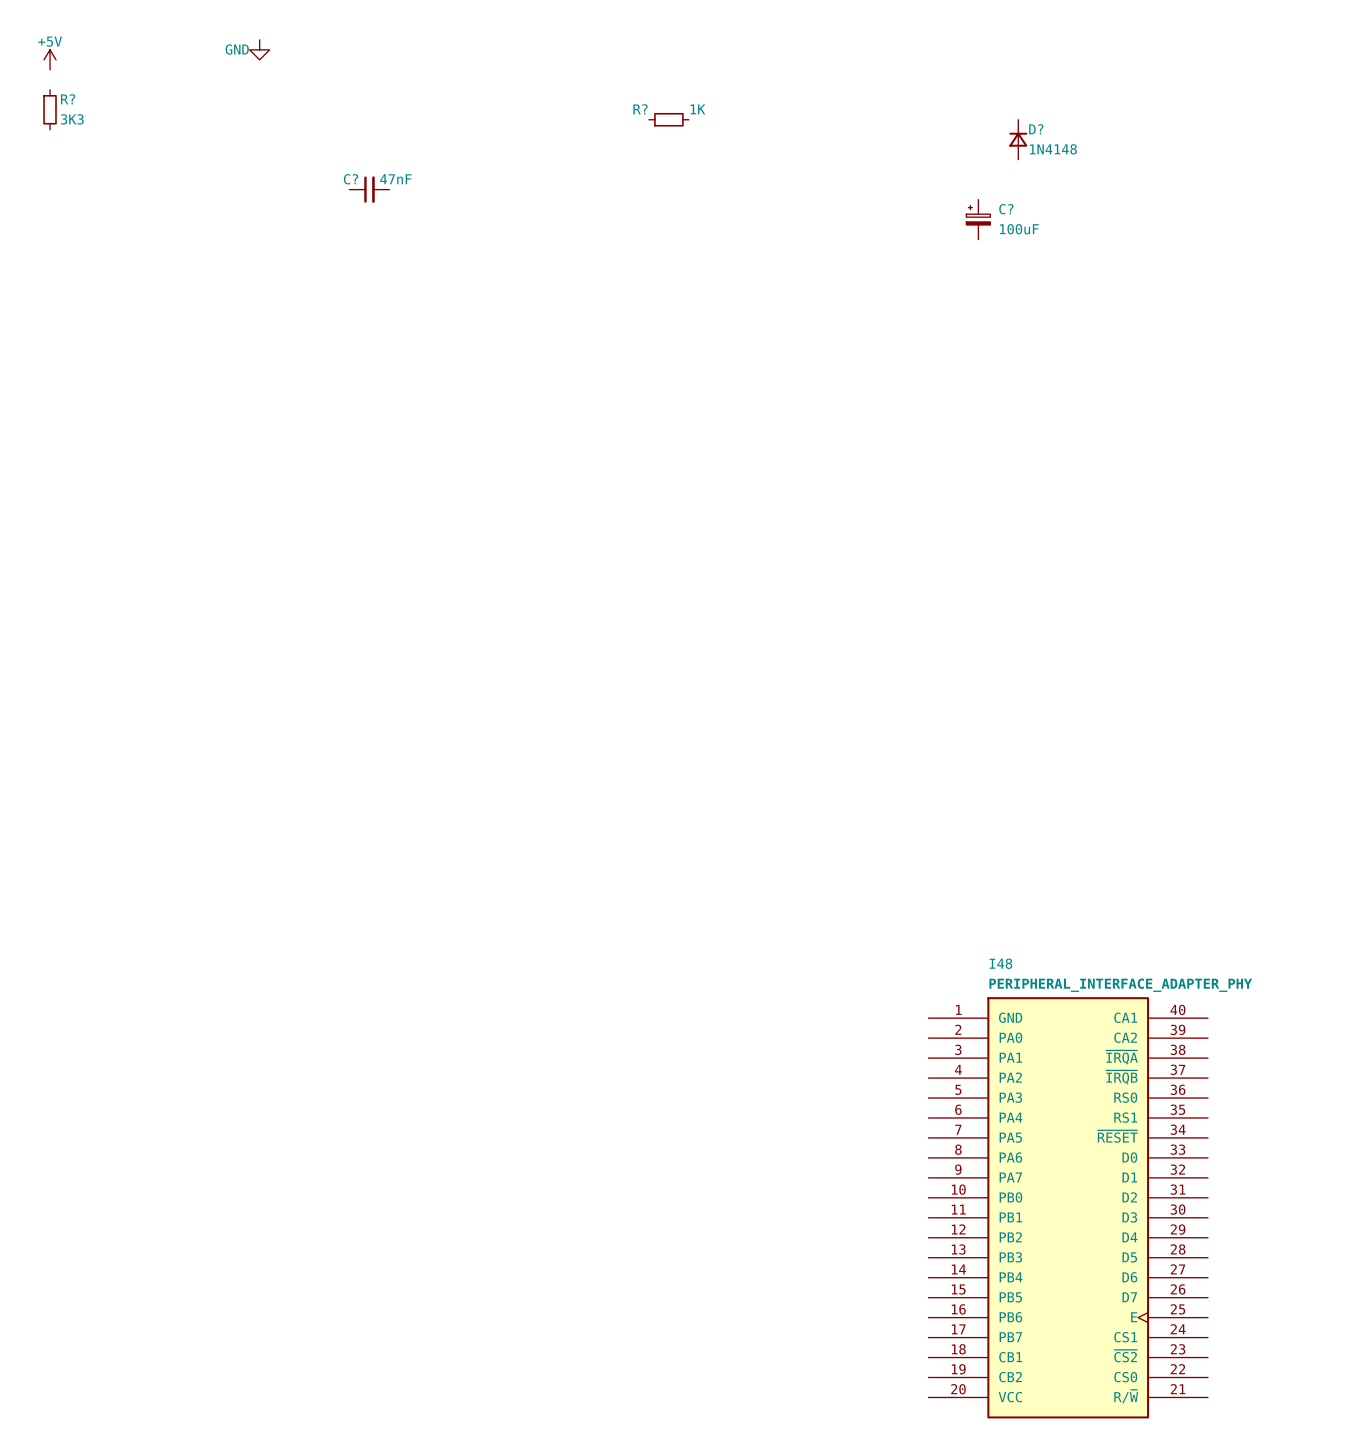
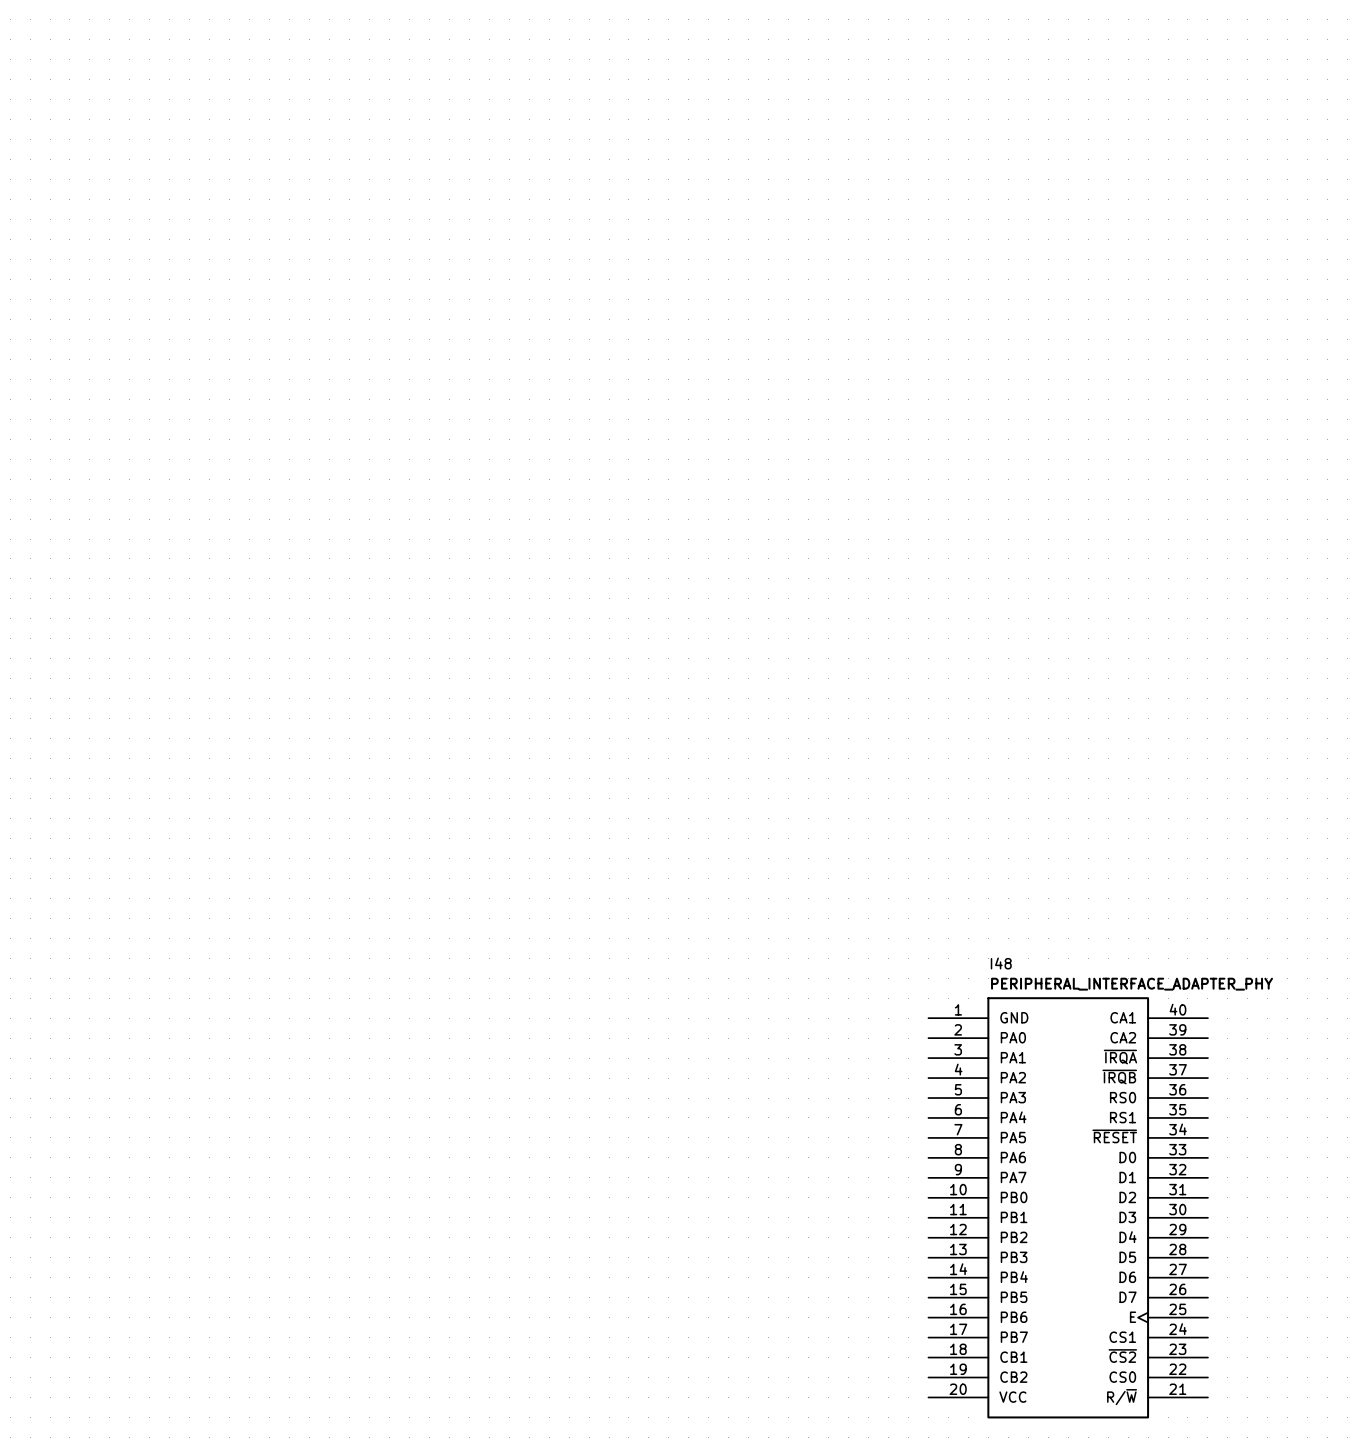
power symbol: GND (259, 49) -> none
power symbol: +5V (50, 59) -> none
R?: 3K3 (50, 109) -> none
R?: 1K (668, 119) -> none
D?: 1N4148 (1018, 139) -> none
C?: 47nF (369, 189) -> none
C?: 100uF (978, 219) -> none

